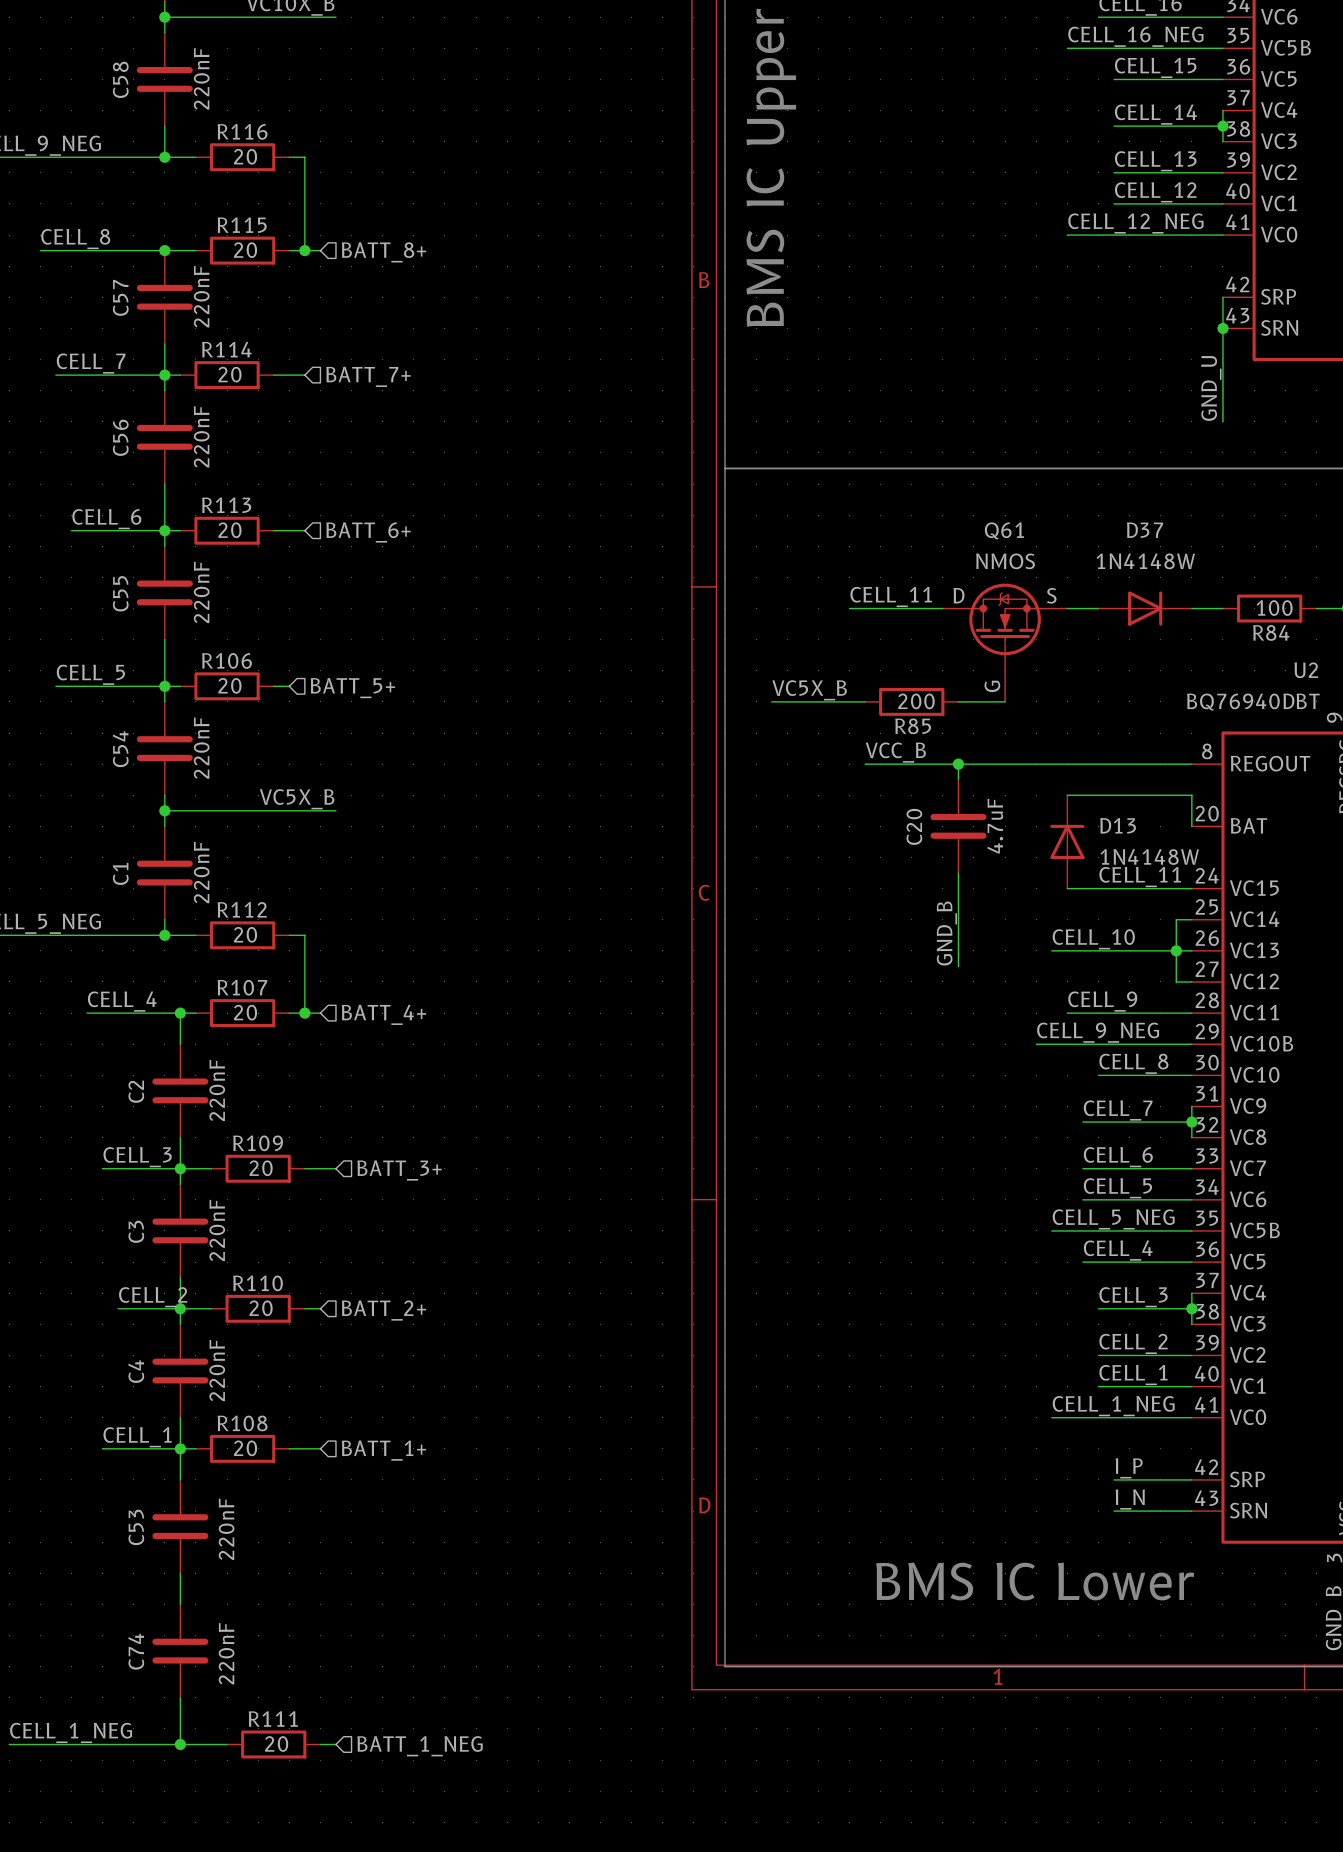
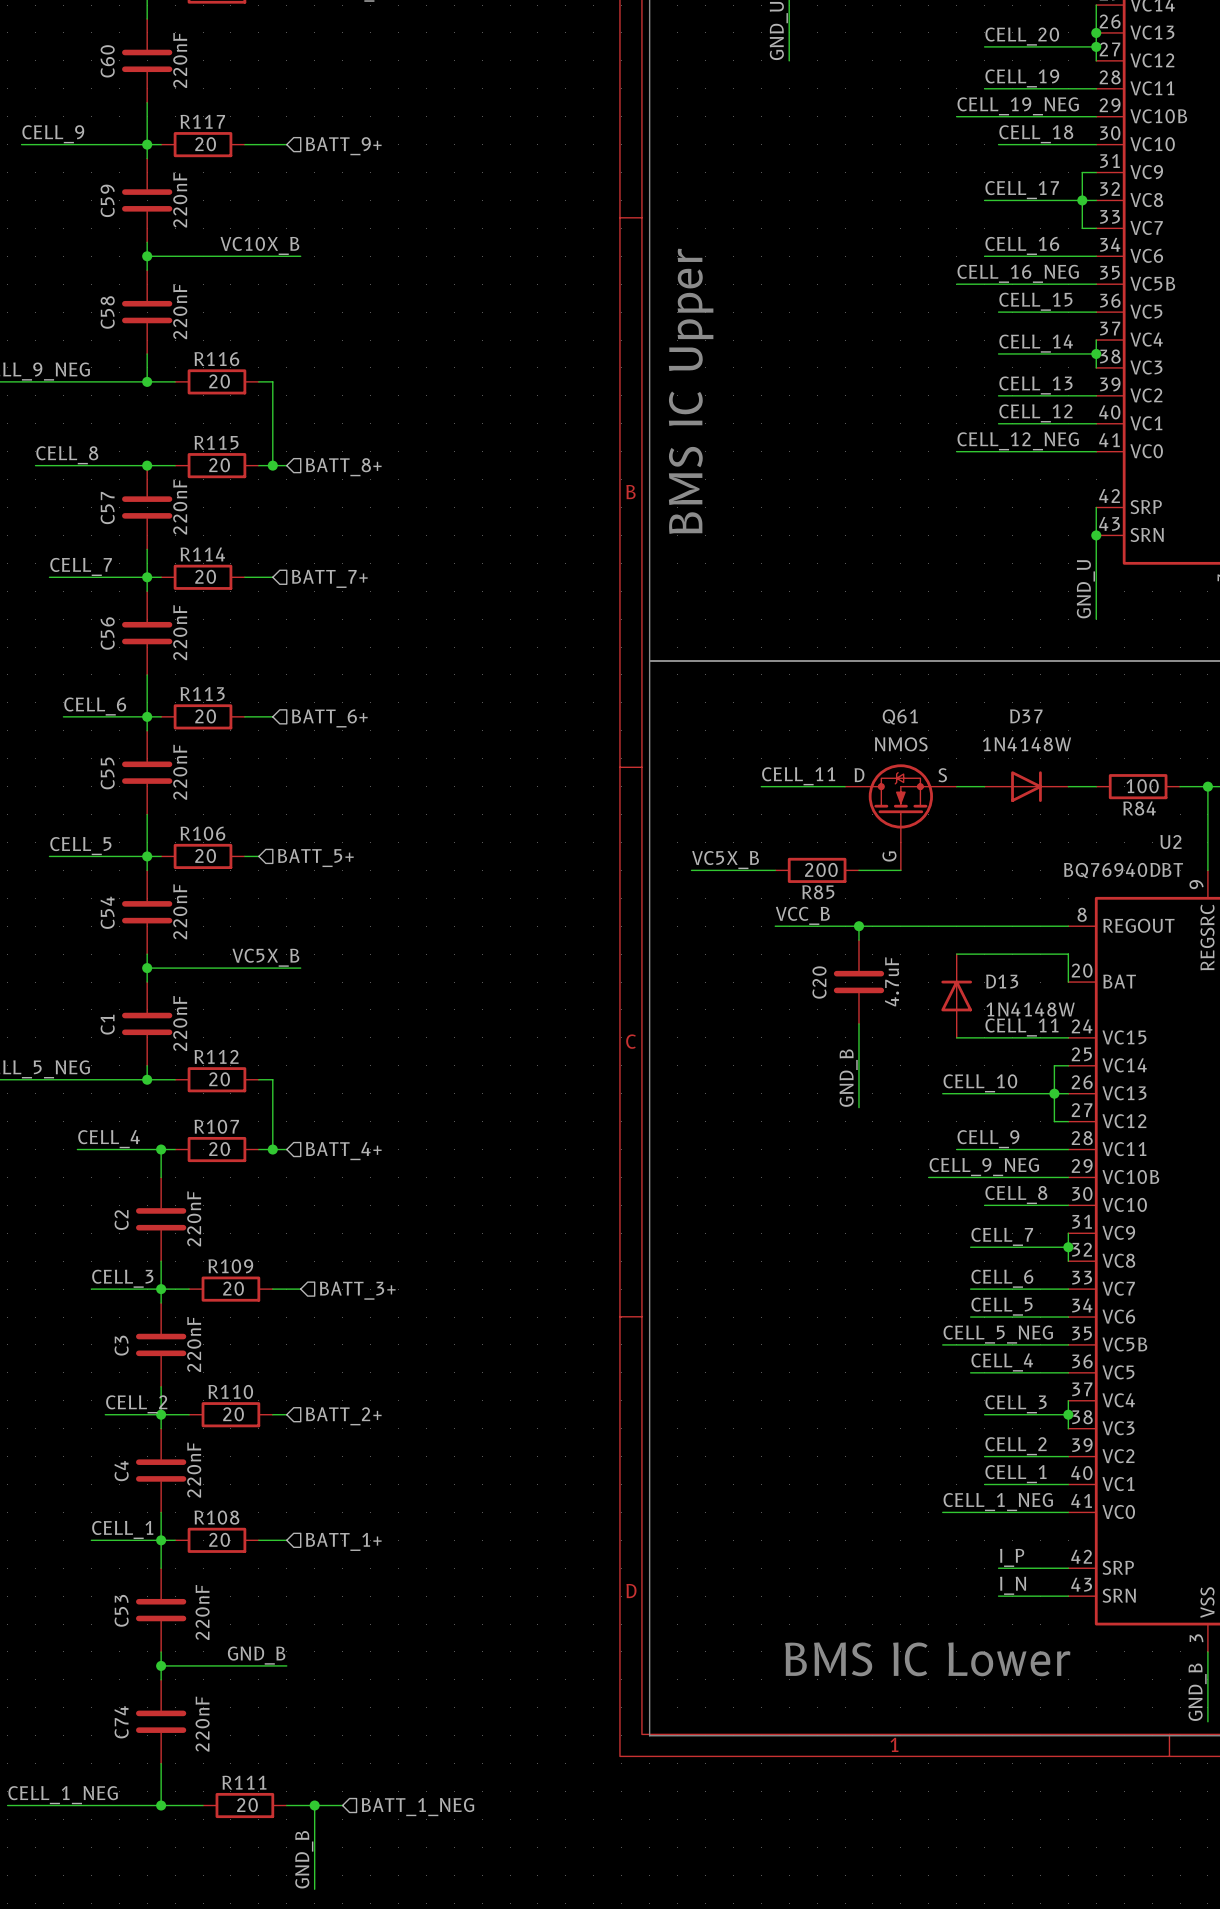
label: none -> GND_B (256, 1655)
wire: none -> (161, 1665) (286, 1665)
junction: none -> (161, 1665)
wire: none -> (300, 1805) (342, 1805)
wire: none -> (314, 1805) (314, 1889)
junction: none -> (314, 1805)
hierarchical label position: BATT_1_NEG (420, 1746) -> BATT_1_NEG (417, 1807)
label: none -> GND_B (304, 1859)

